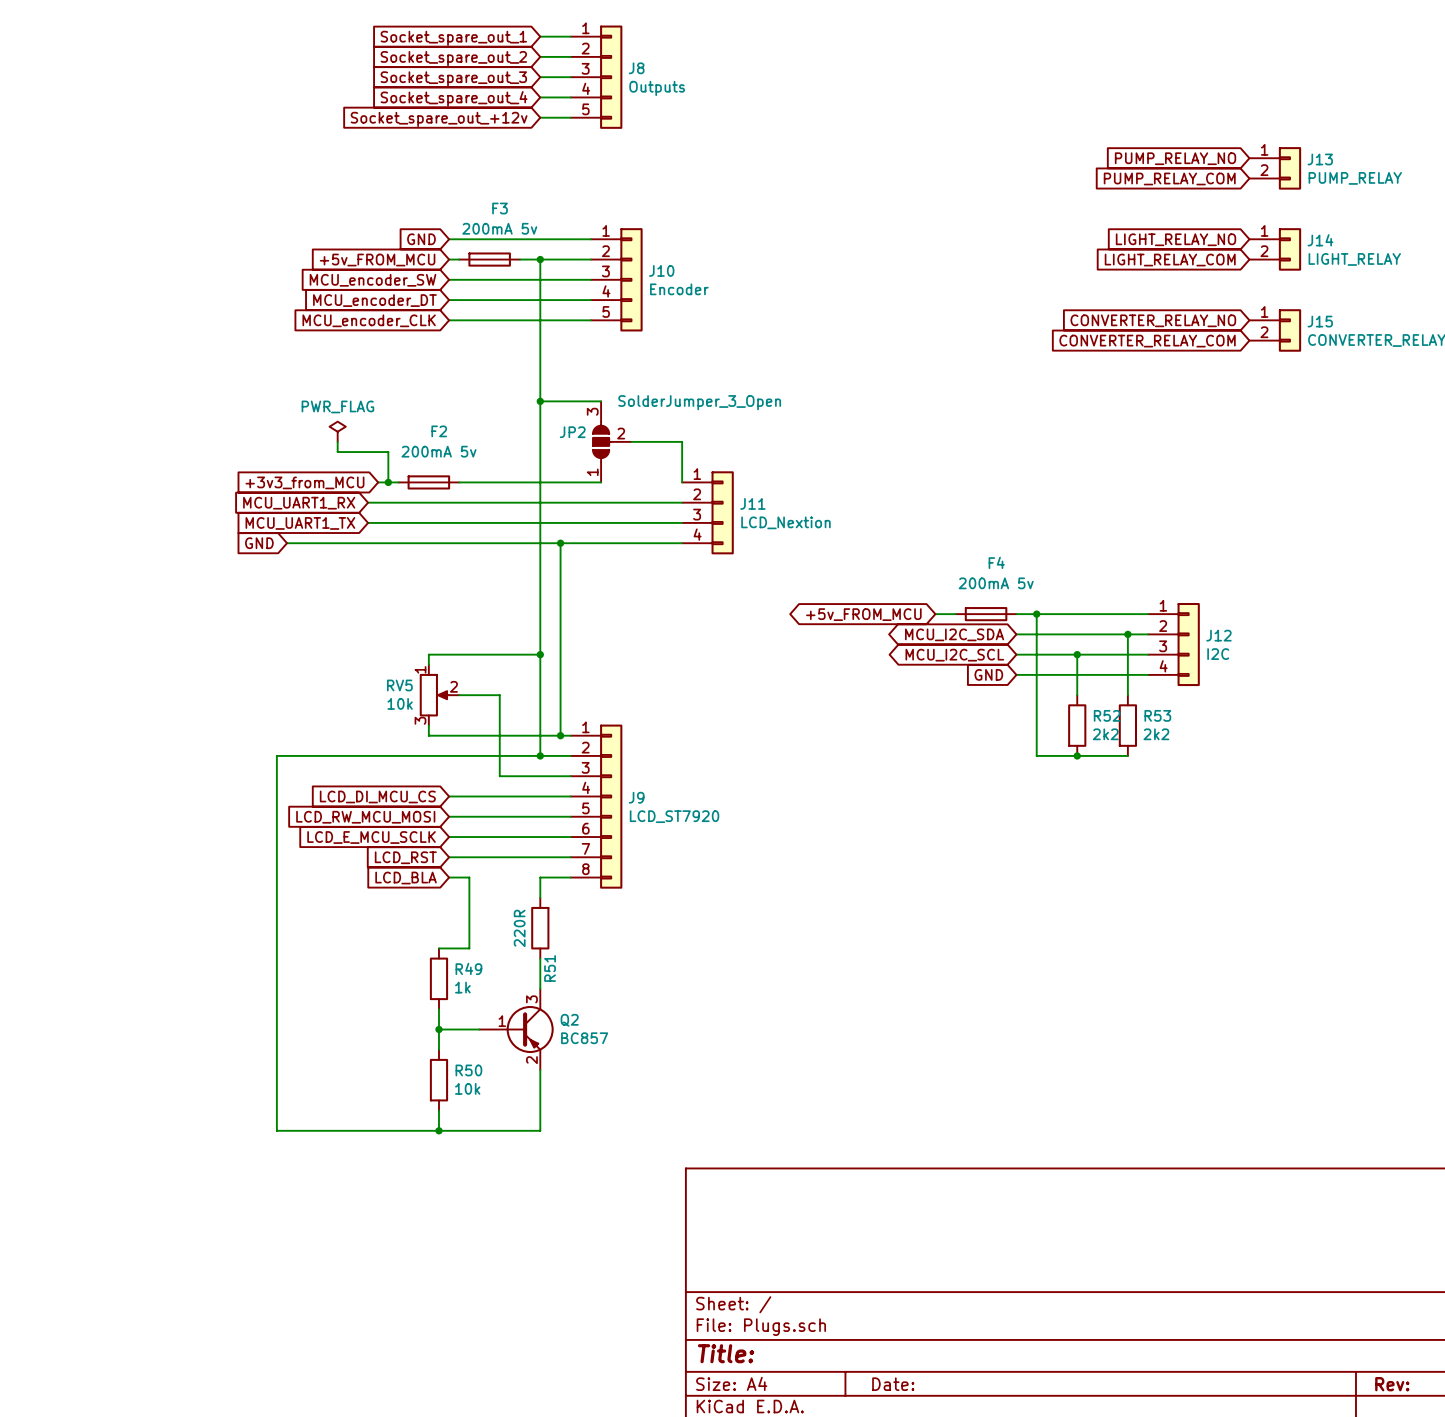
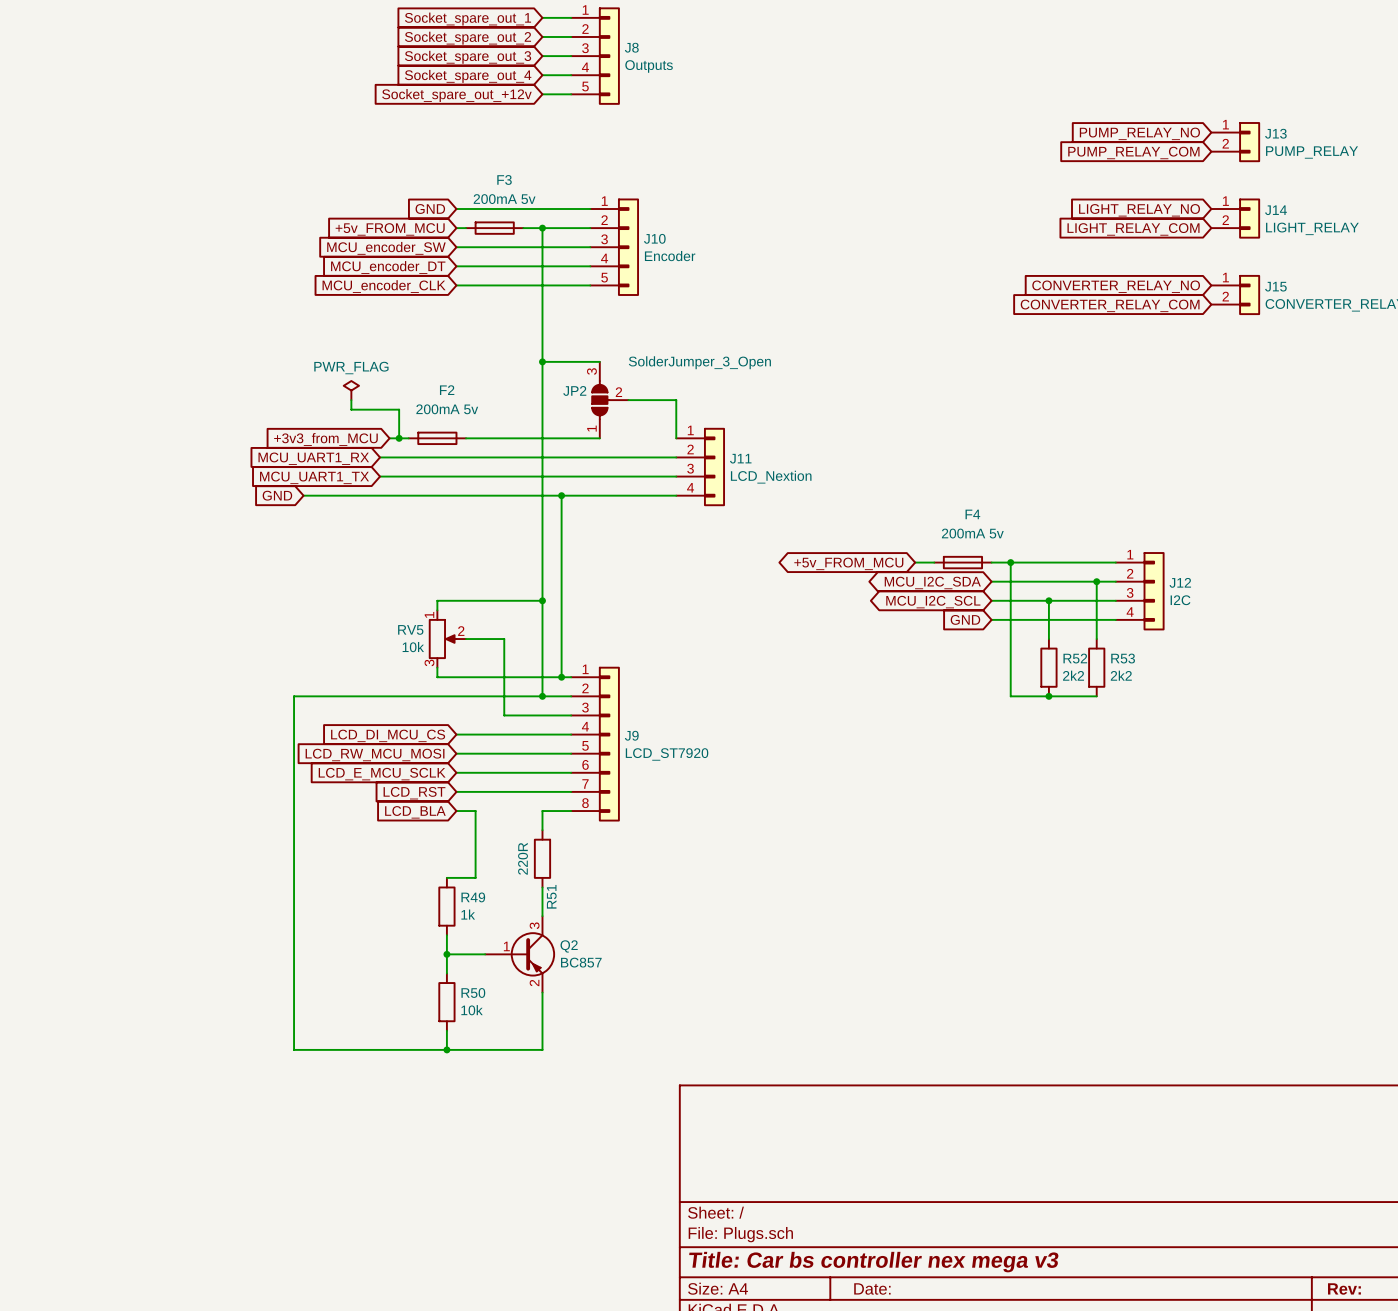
title block: Title: (726, 1353) -> Title: Car bs controller nex mega v3 (873, 1262)

